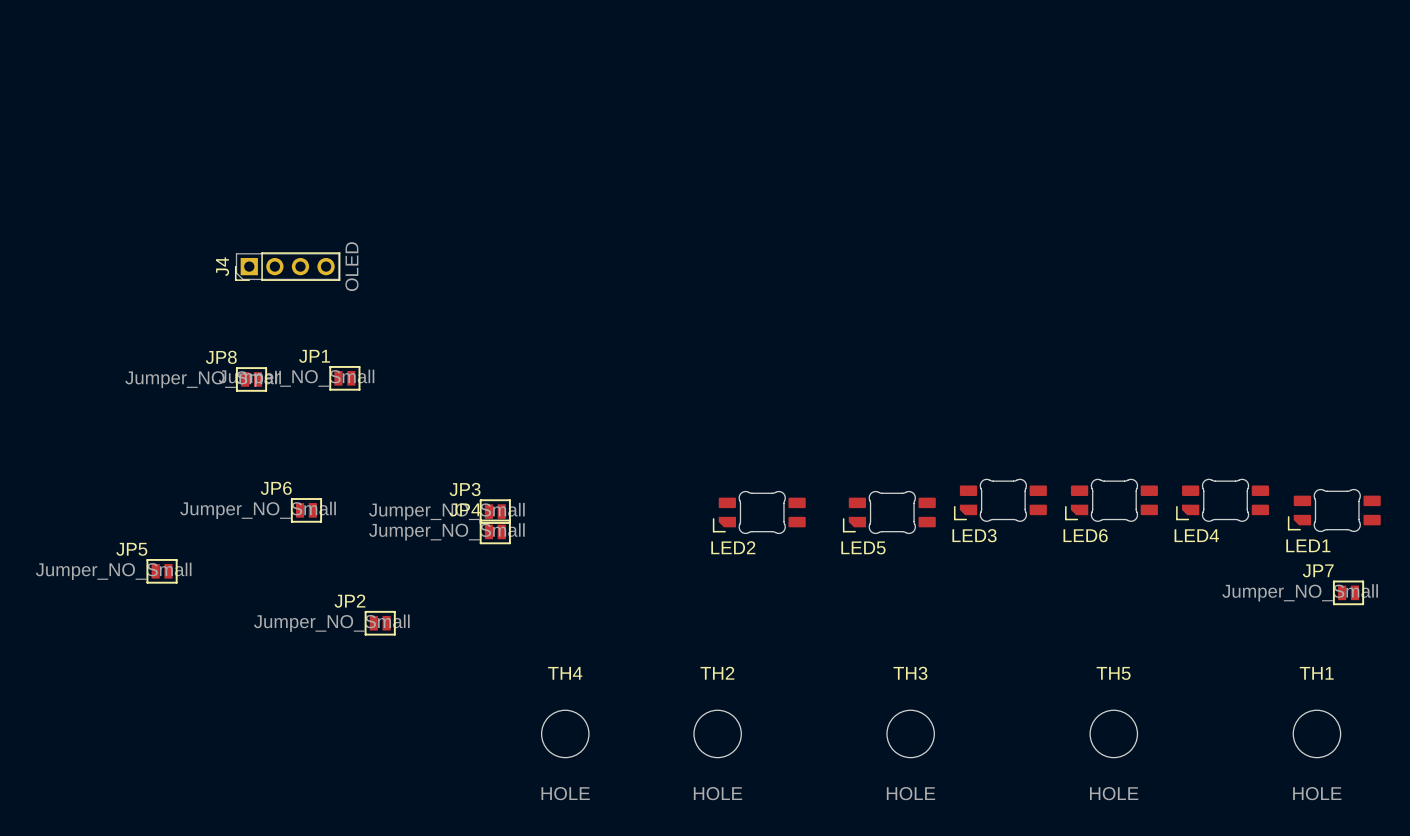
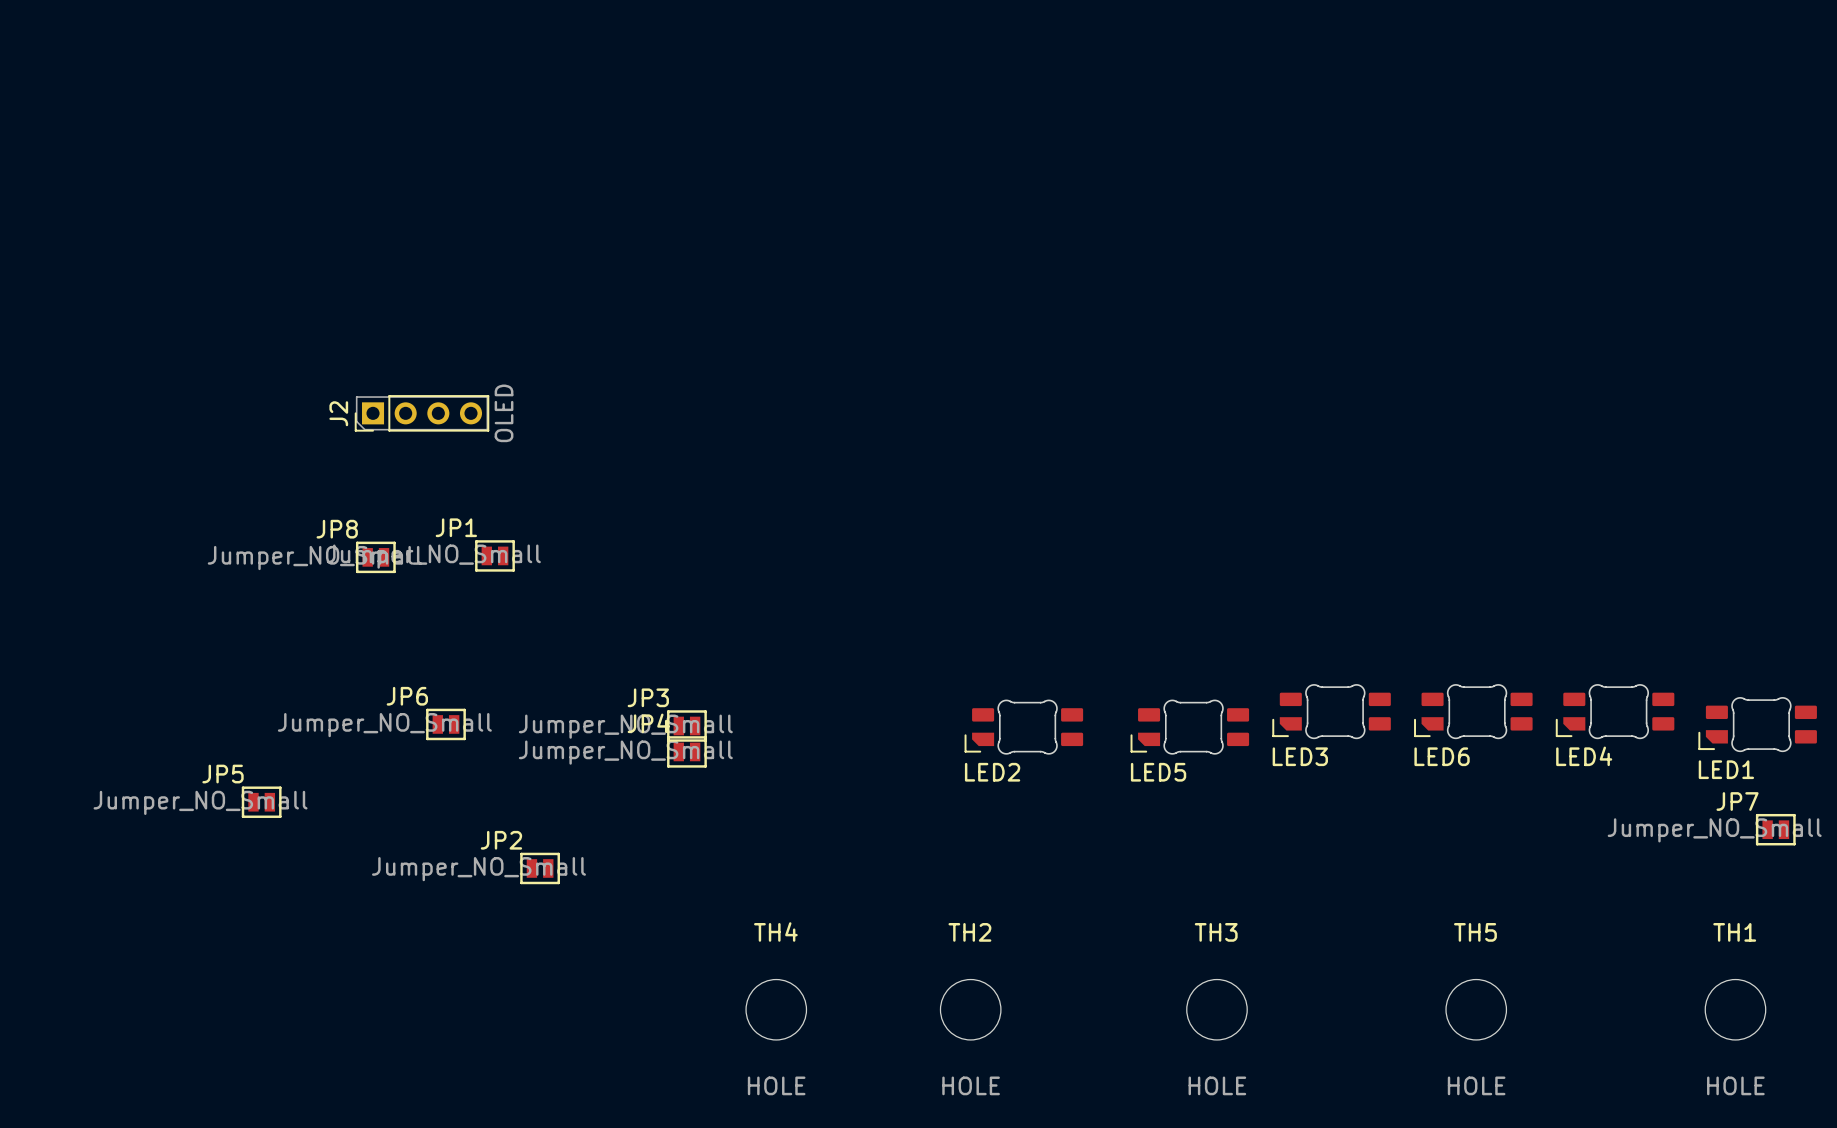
J4 name: J4 (222, 266) -> J2 (338, 413)

